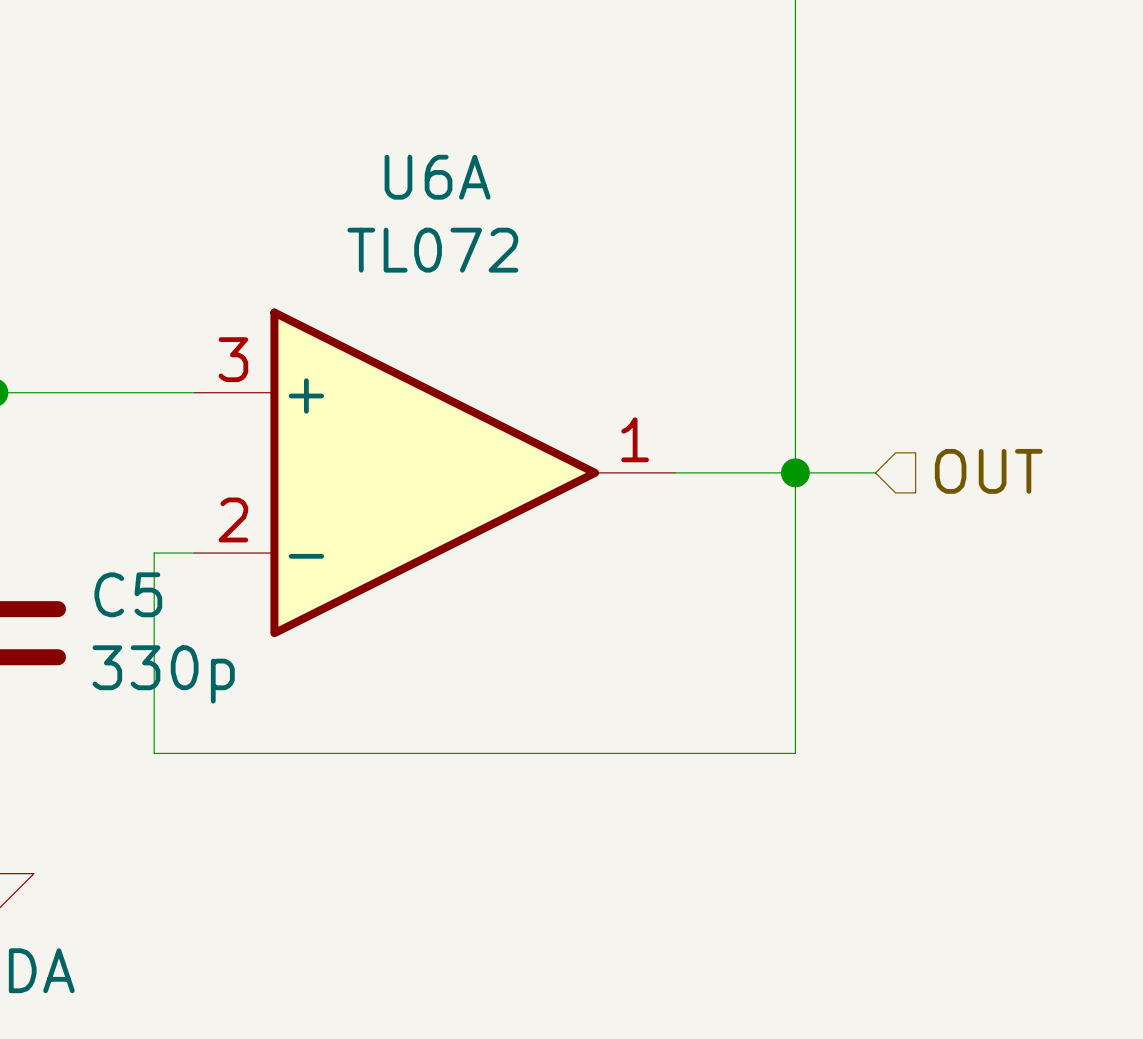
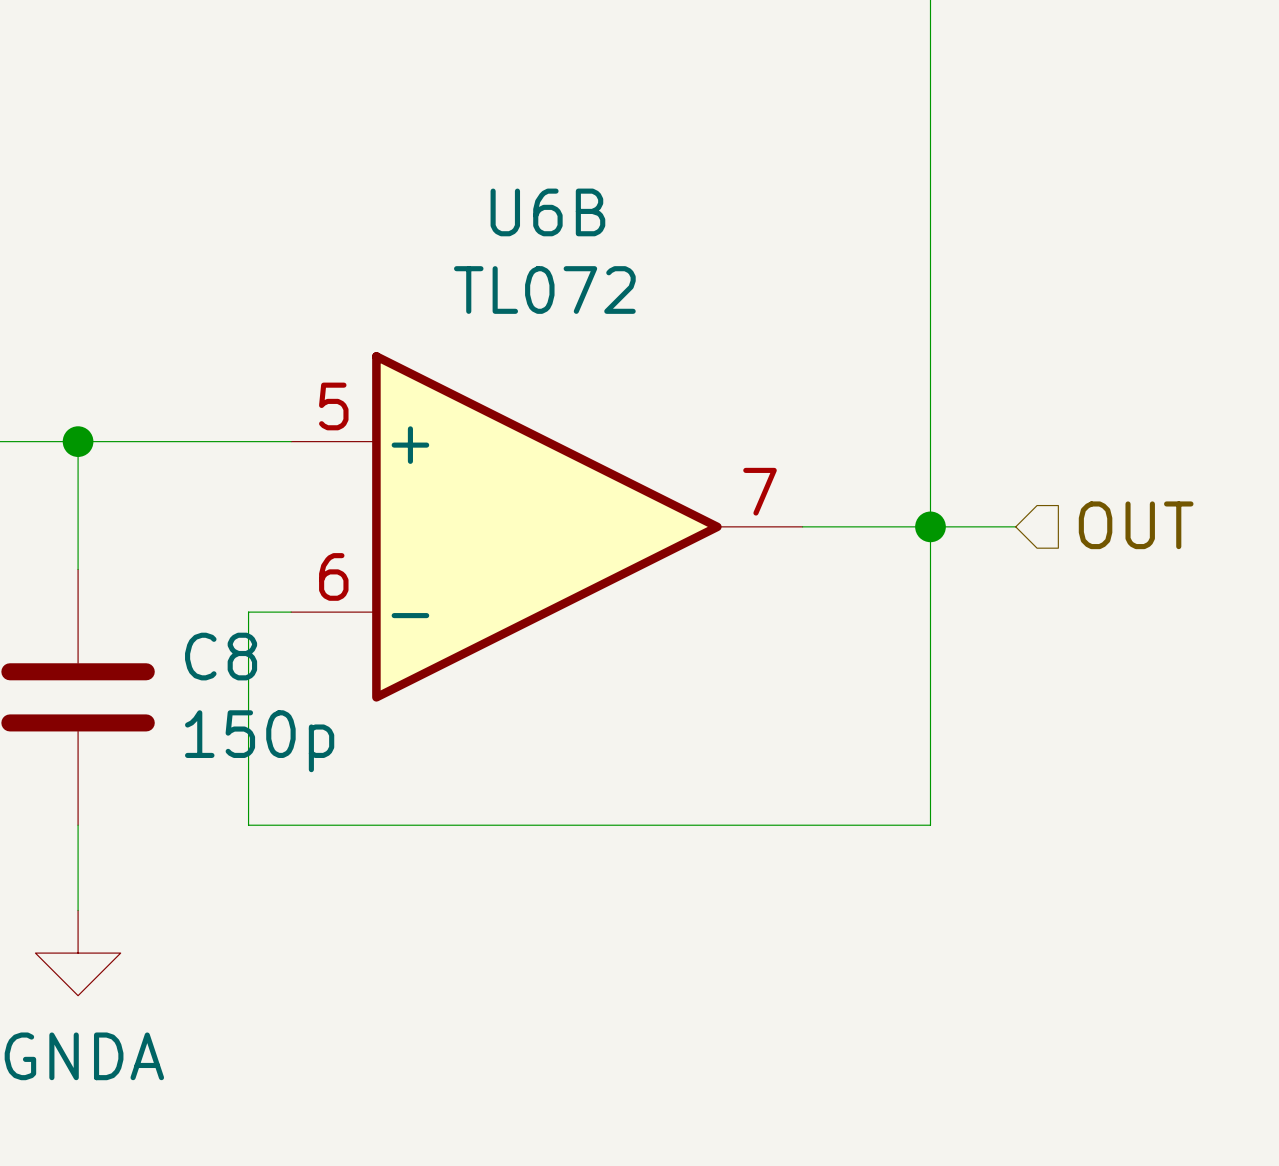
U6A name: U6A (437, 177) -> U6B (547, 212)
U6A pin number: 3 (233, 359) -> 5 (333, 406)
U6A pin number: 1 (635, 439) -> 7 (760, 491)
U6A pin number: 2 (233, 519) -> 6 (333, 576)
C5 name: C5 (128, 594) -> C8 (221, 656)
C5 value: 330p (163, 674) -> 150p (259, 741)

